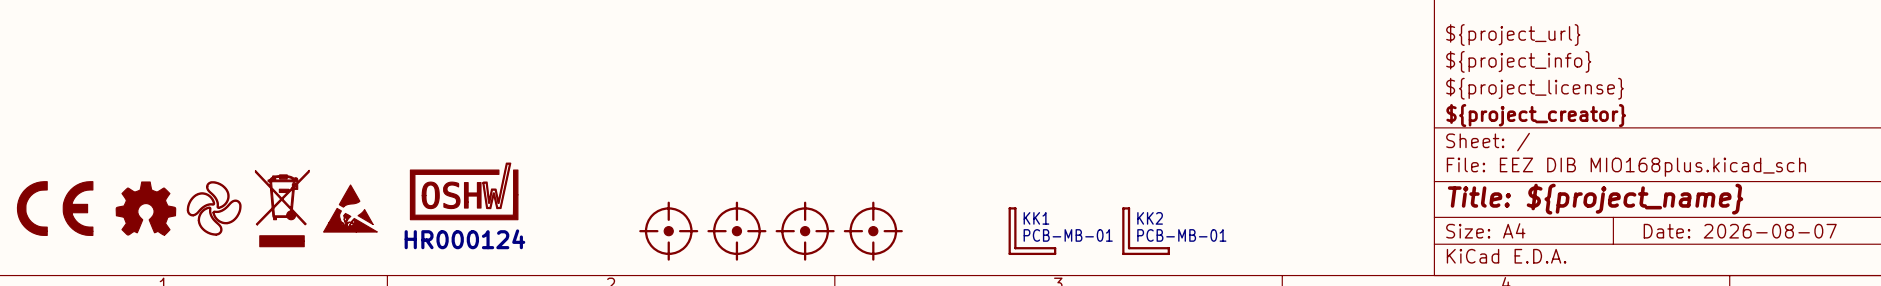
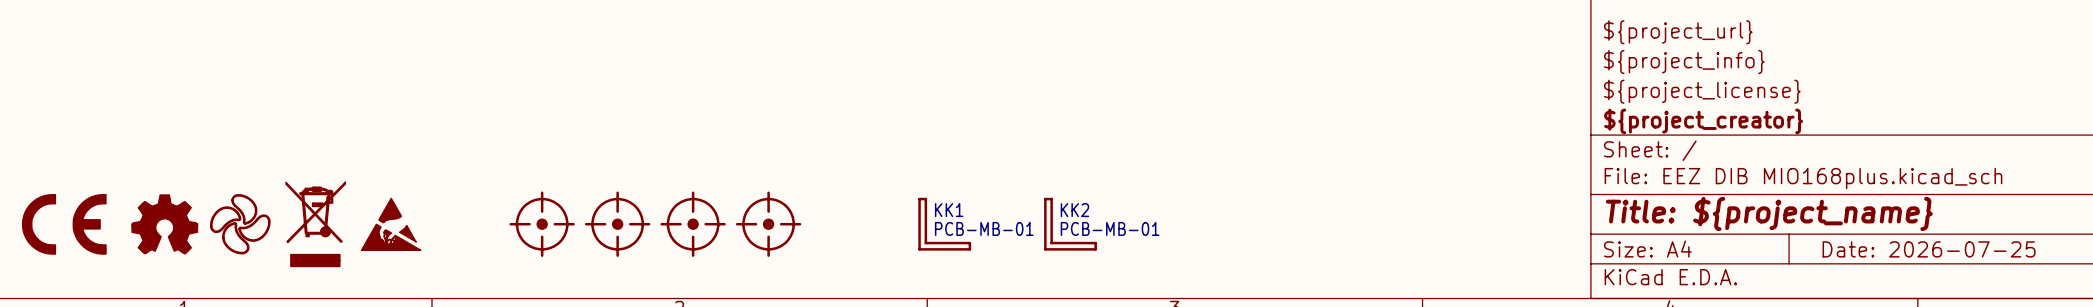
part: (464, 191) -> none
part: none -> (542, 224)
part: none -> (617, 224)
part: none -> (693, 224)
part: none -> (768, 224)
part: (668, 231) -> none
part: (736, 231) -> none
part: (805, 231) -> none
part: (873, 231) -> none
KK1 position: (1032, 231) -> (944, 224)
KK2 position: (1146, 231) -> (1070, 224)
title block: Date: 2026-08-07 (1740, 231) -> Date: 2026-07-25 (1929, 249)
text: HR000124 (464, 239) -> none

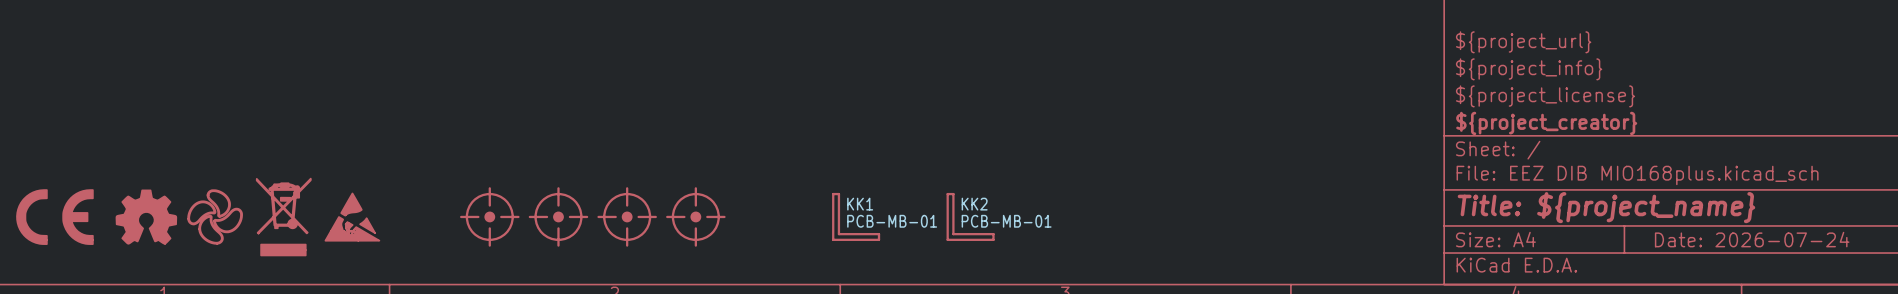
title block: Date: 2026-07-25 (1929, 249) -> Date: 2026-07-24 (1752, 239)

